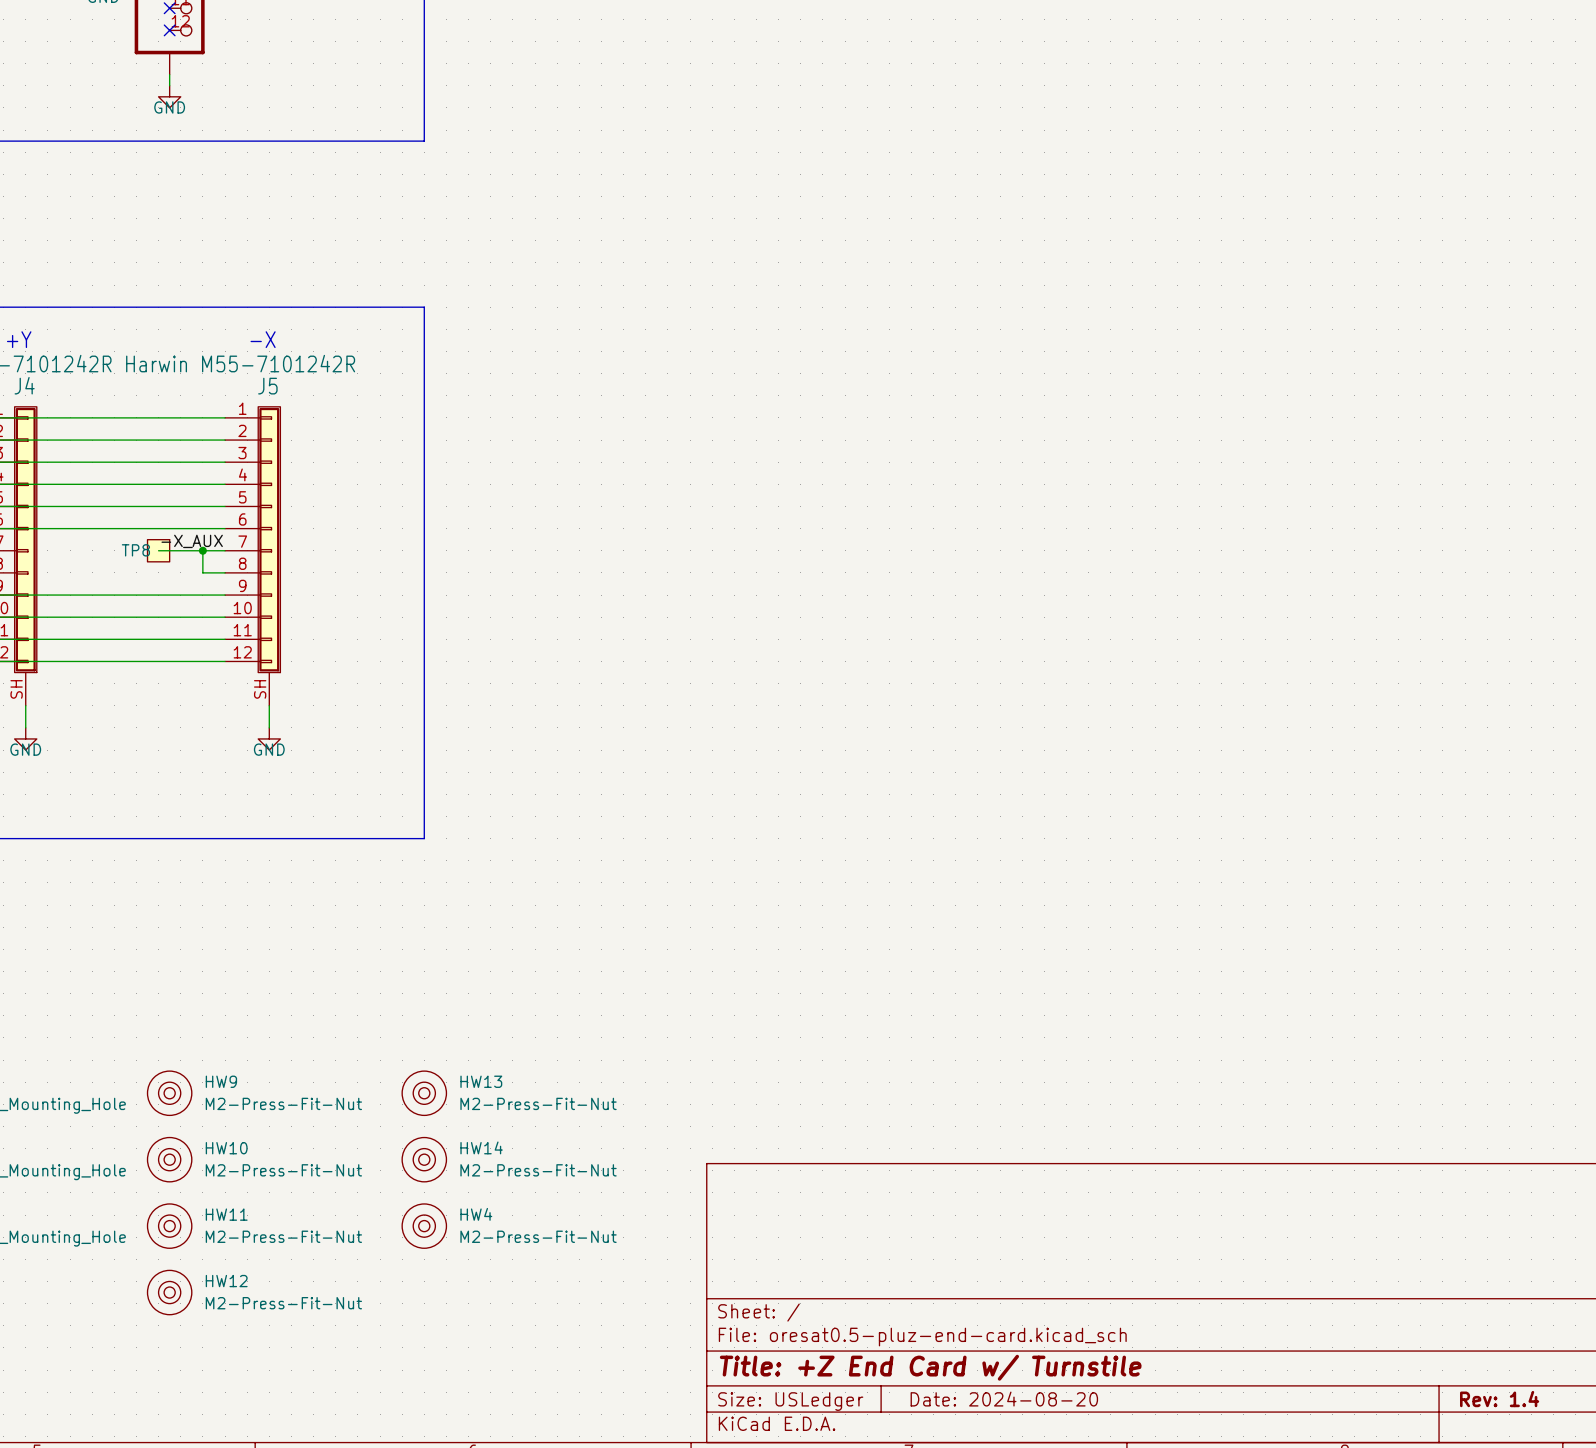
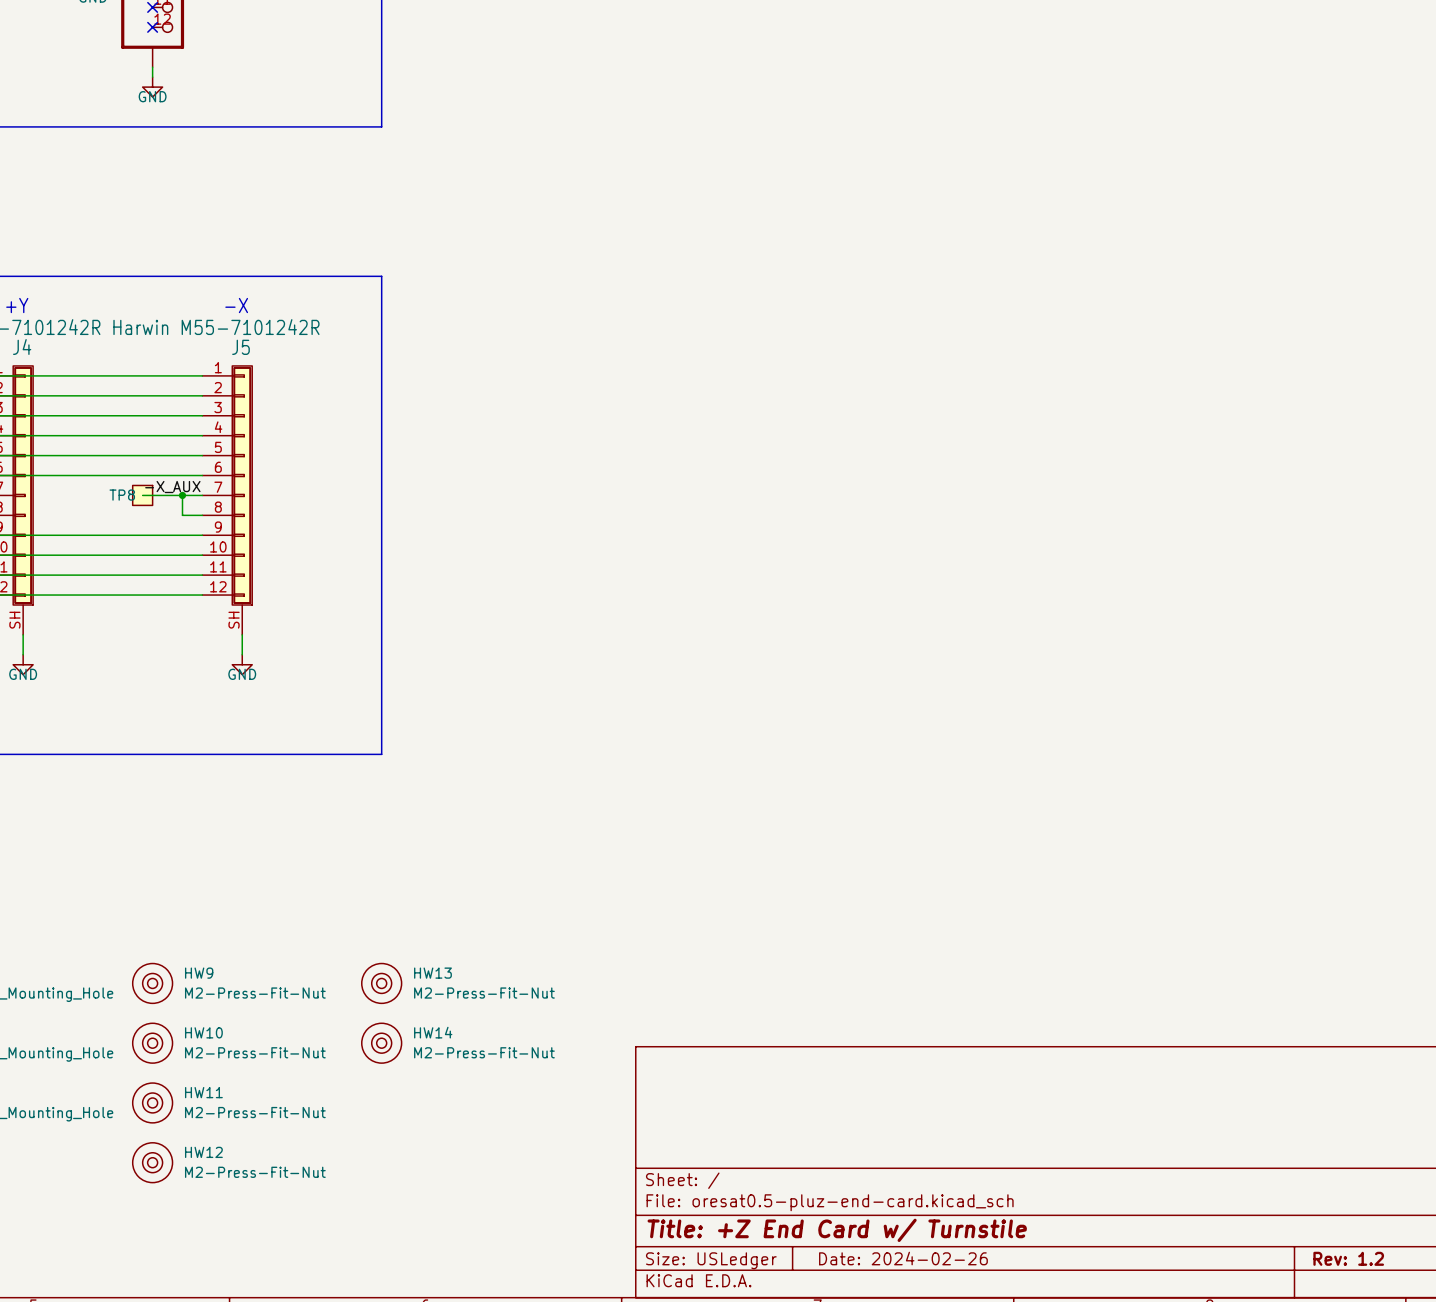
HW4: M2-Press-Fit-Nut (424, 1226) -> none
title block: Date: 2024-08-20 (1004, 1399) -> Date: 2024-02-26 (903, 1258)
title block: Rev: 1.4 (1499, 1399) -> Rev: 1.2 (1348, 1258)

